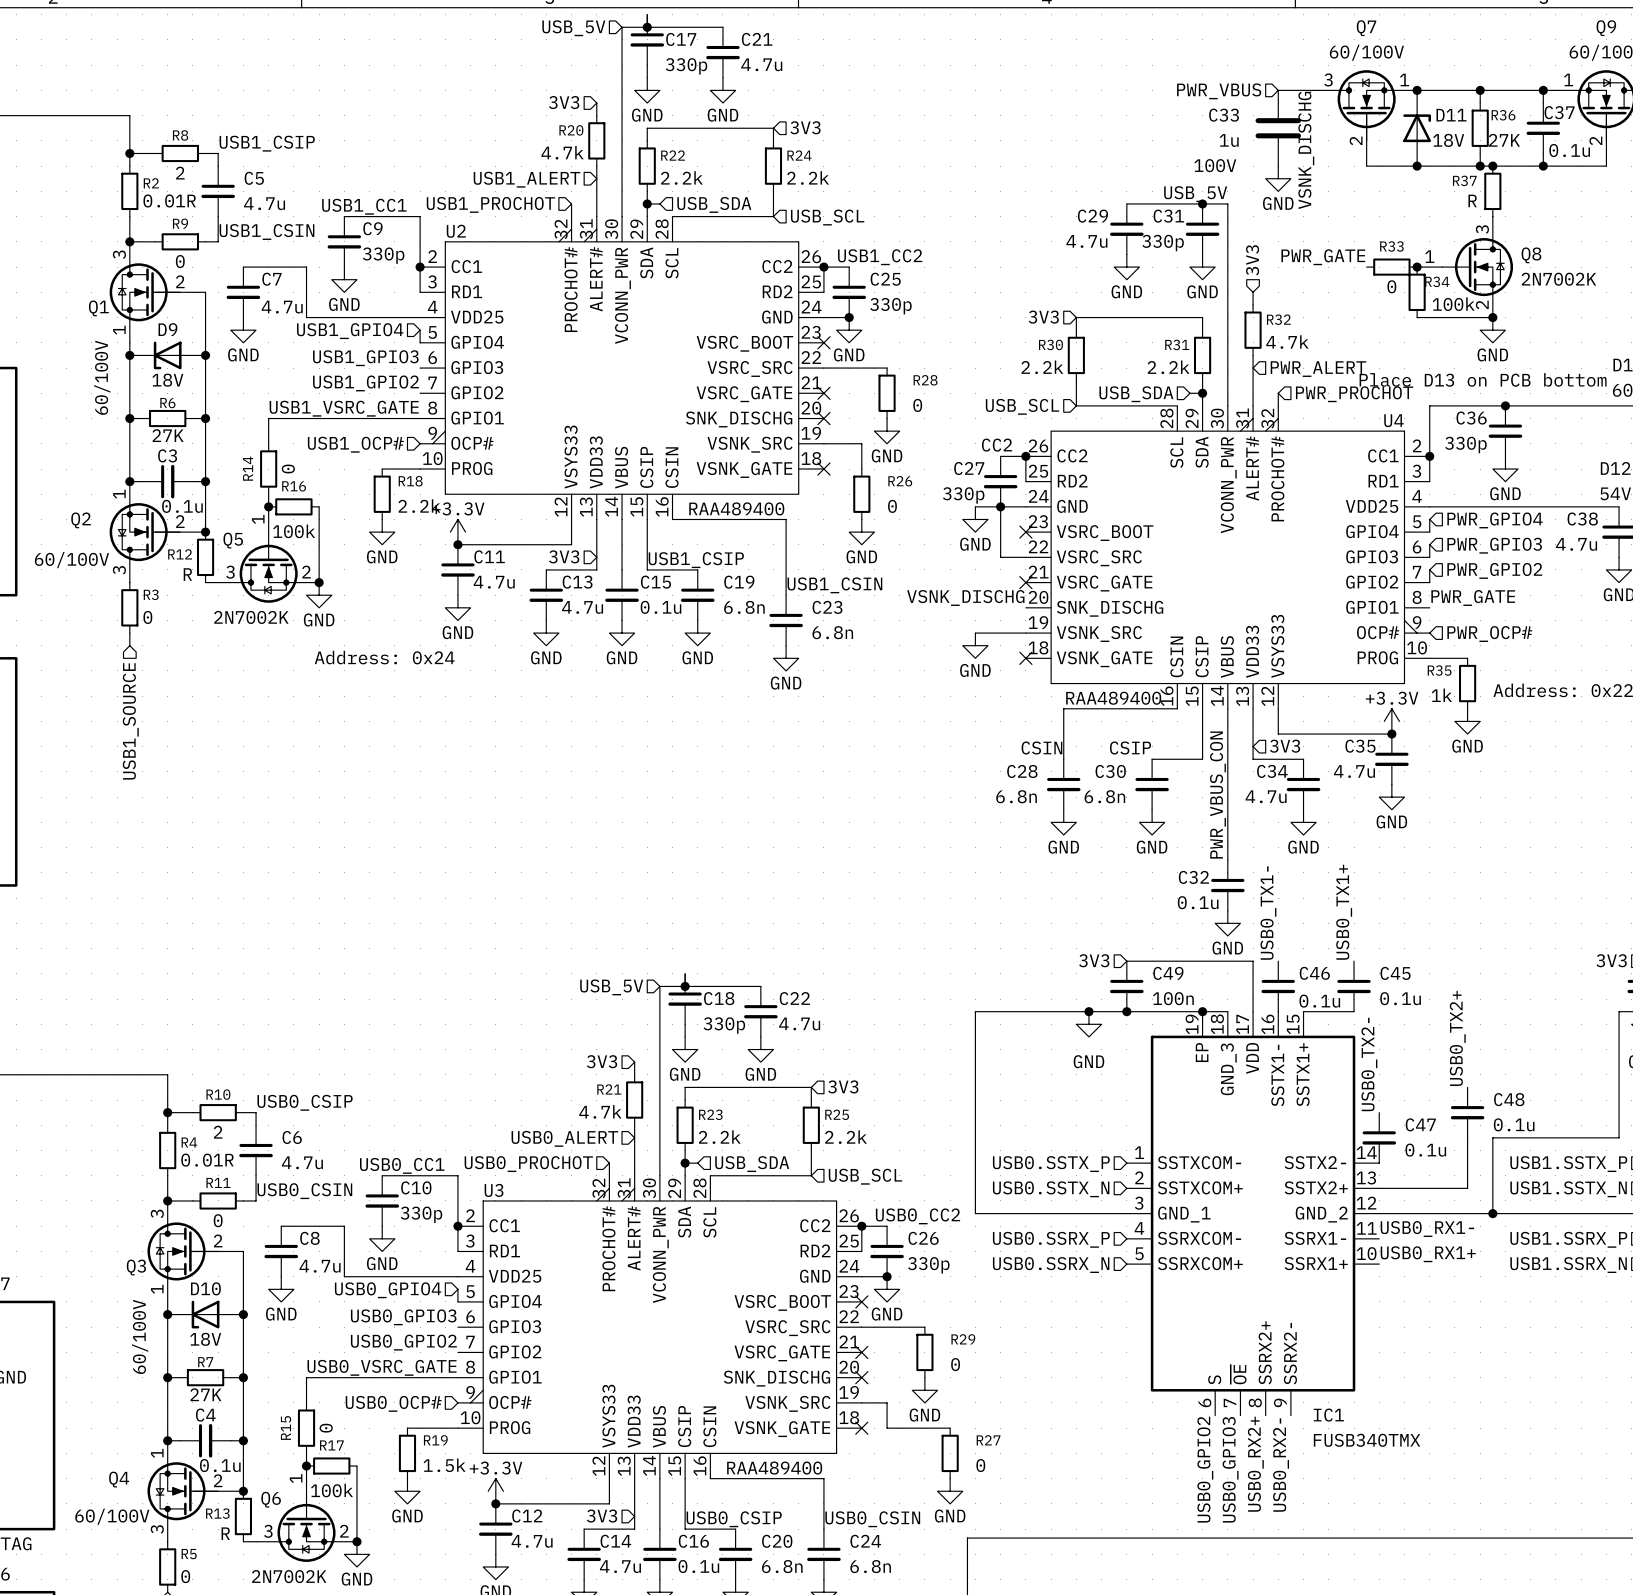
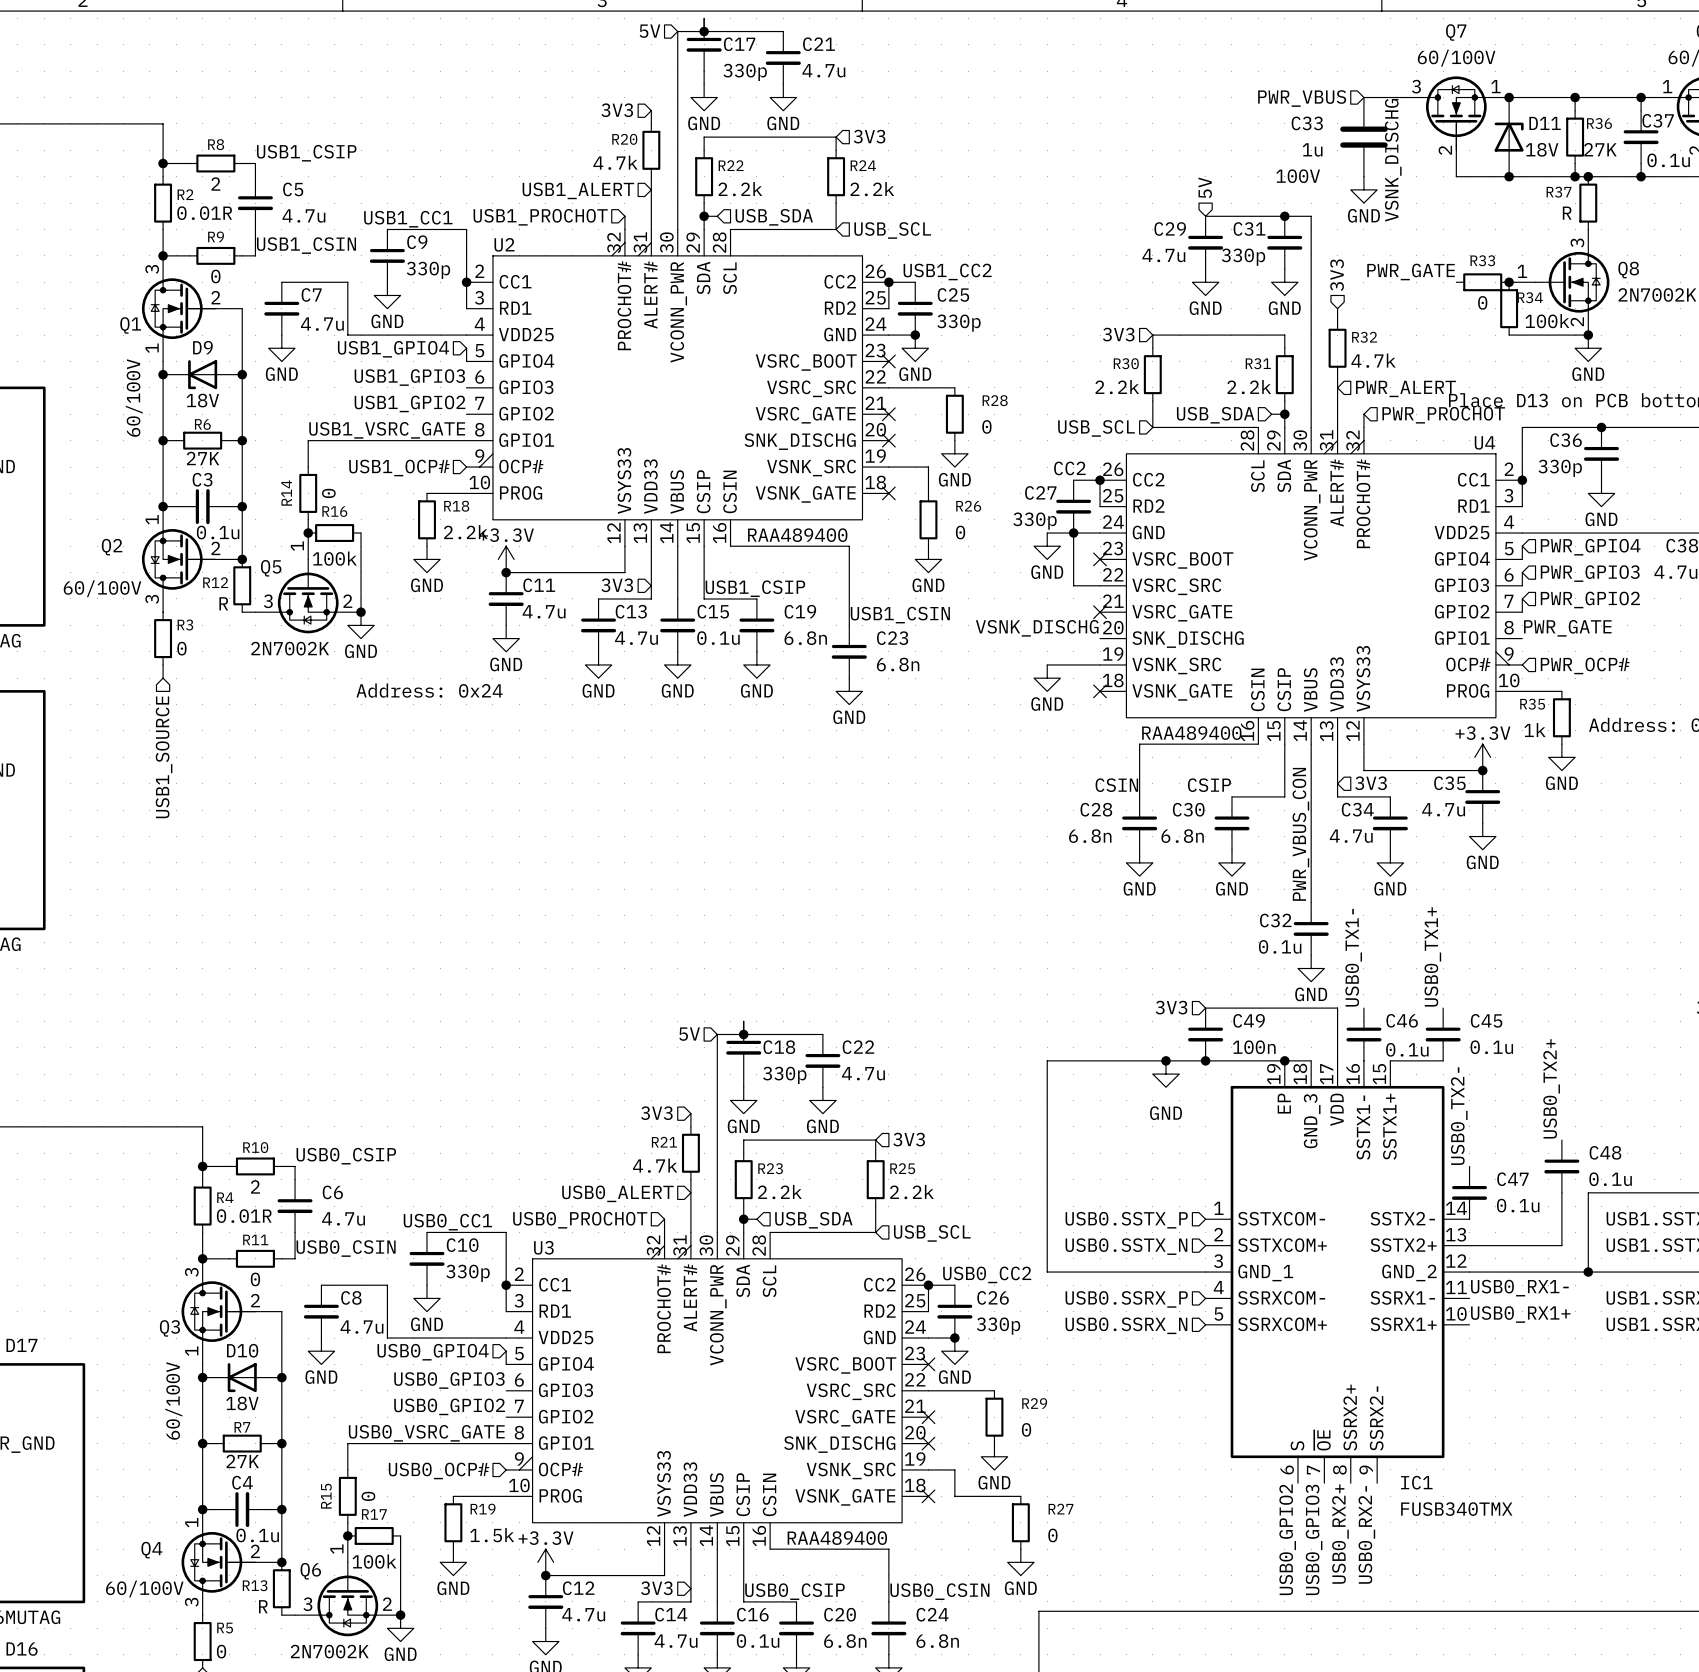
hierarchical label: USB_5V (573, 28) -> 5V (649, 31)
hierarchical label: none -> 5V (1205, 187)
label: USB_5V (1195, 194) -> none
hierarchical label: USB_5V (611, 987) -> 5V (689, 1034)

